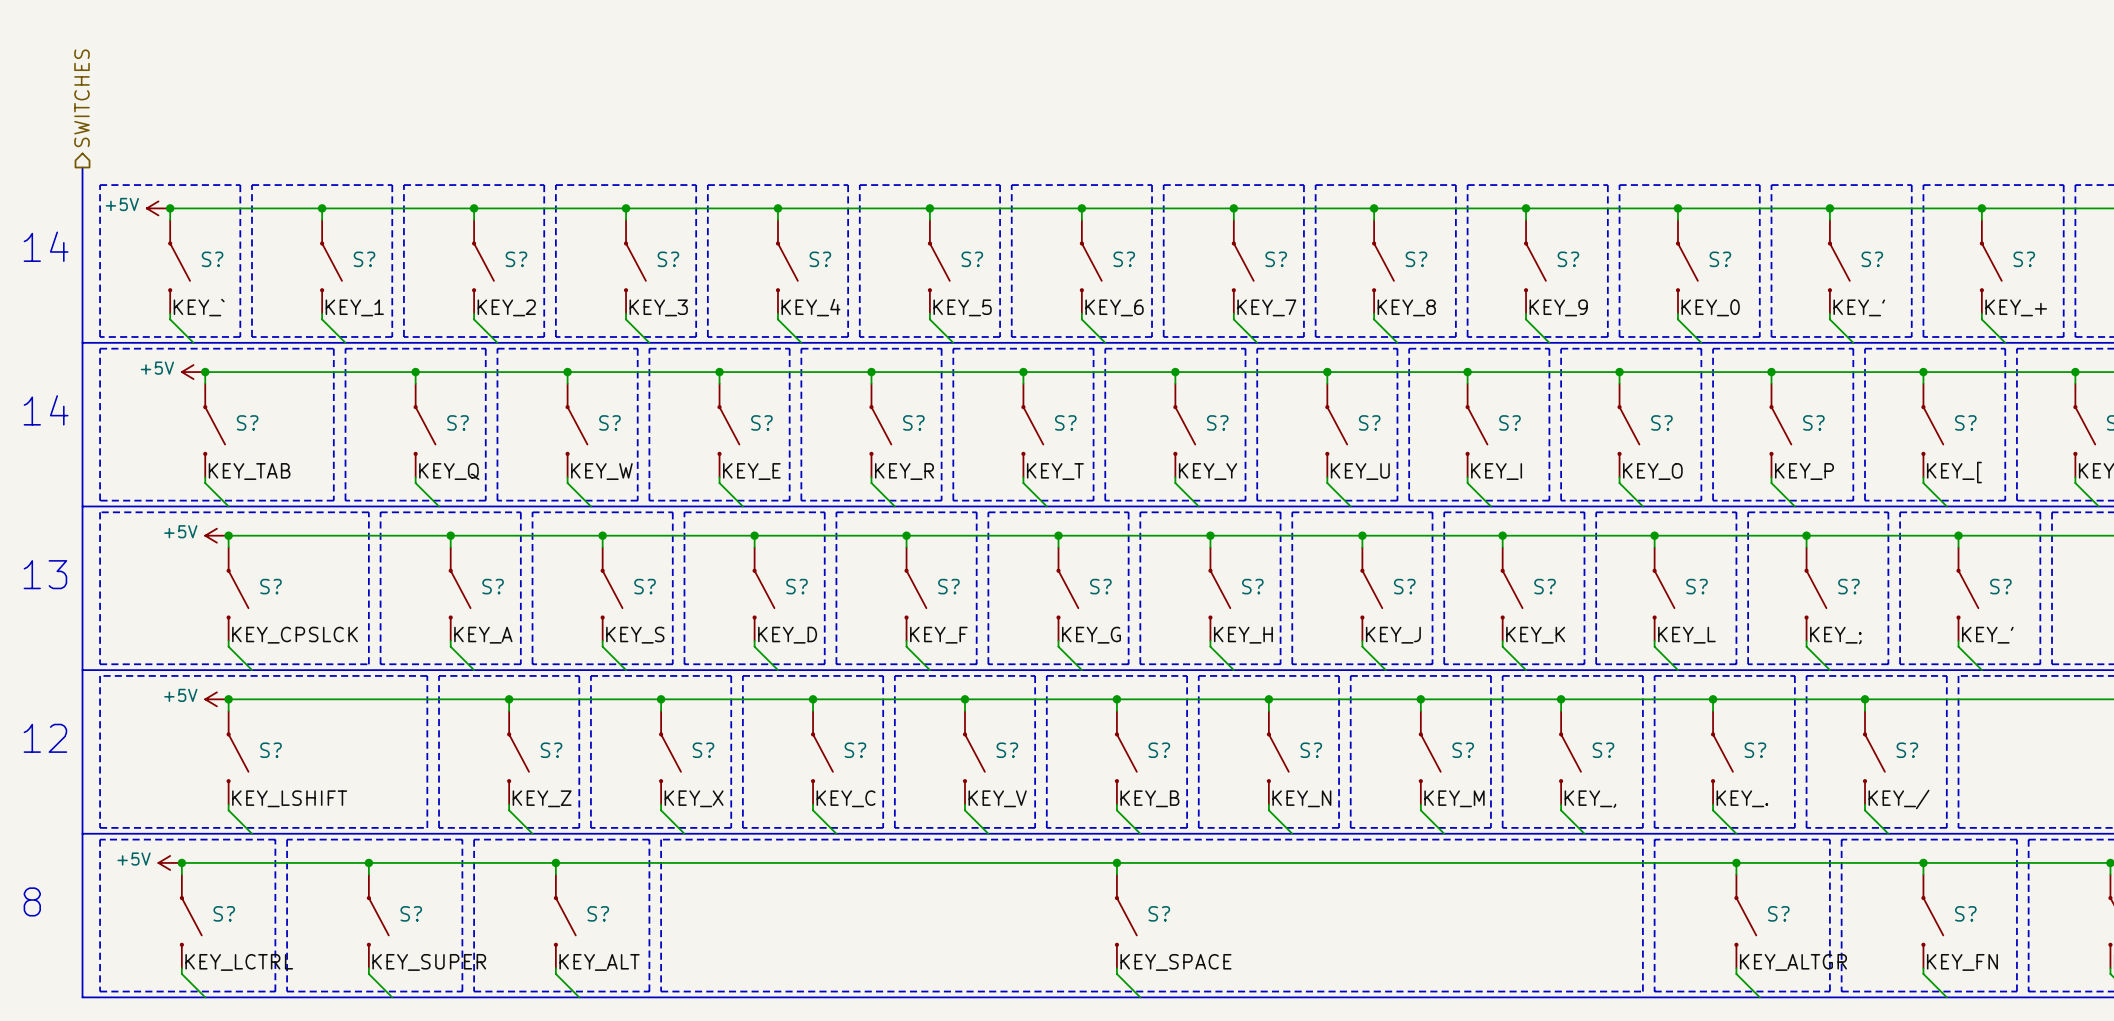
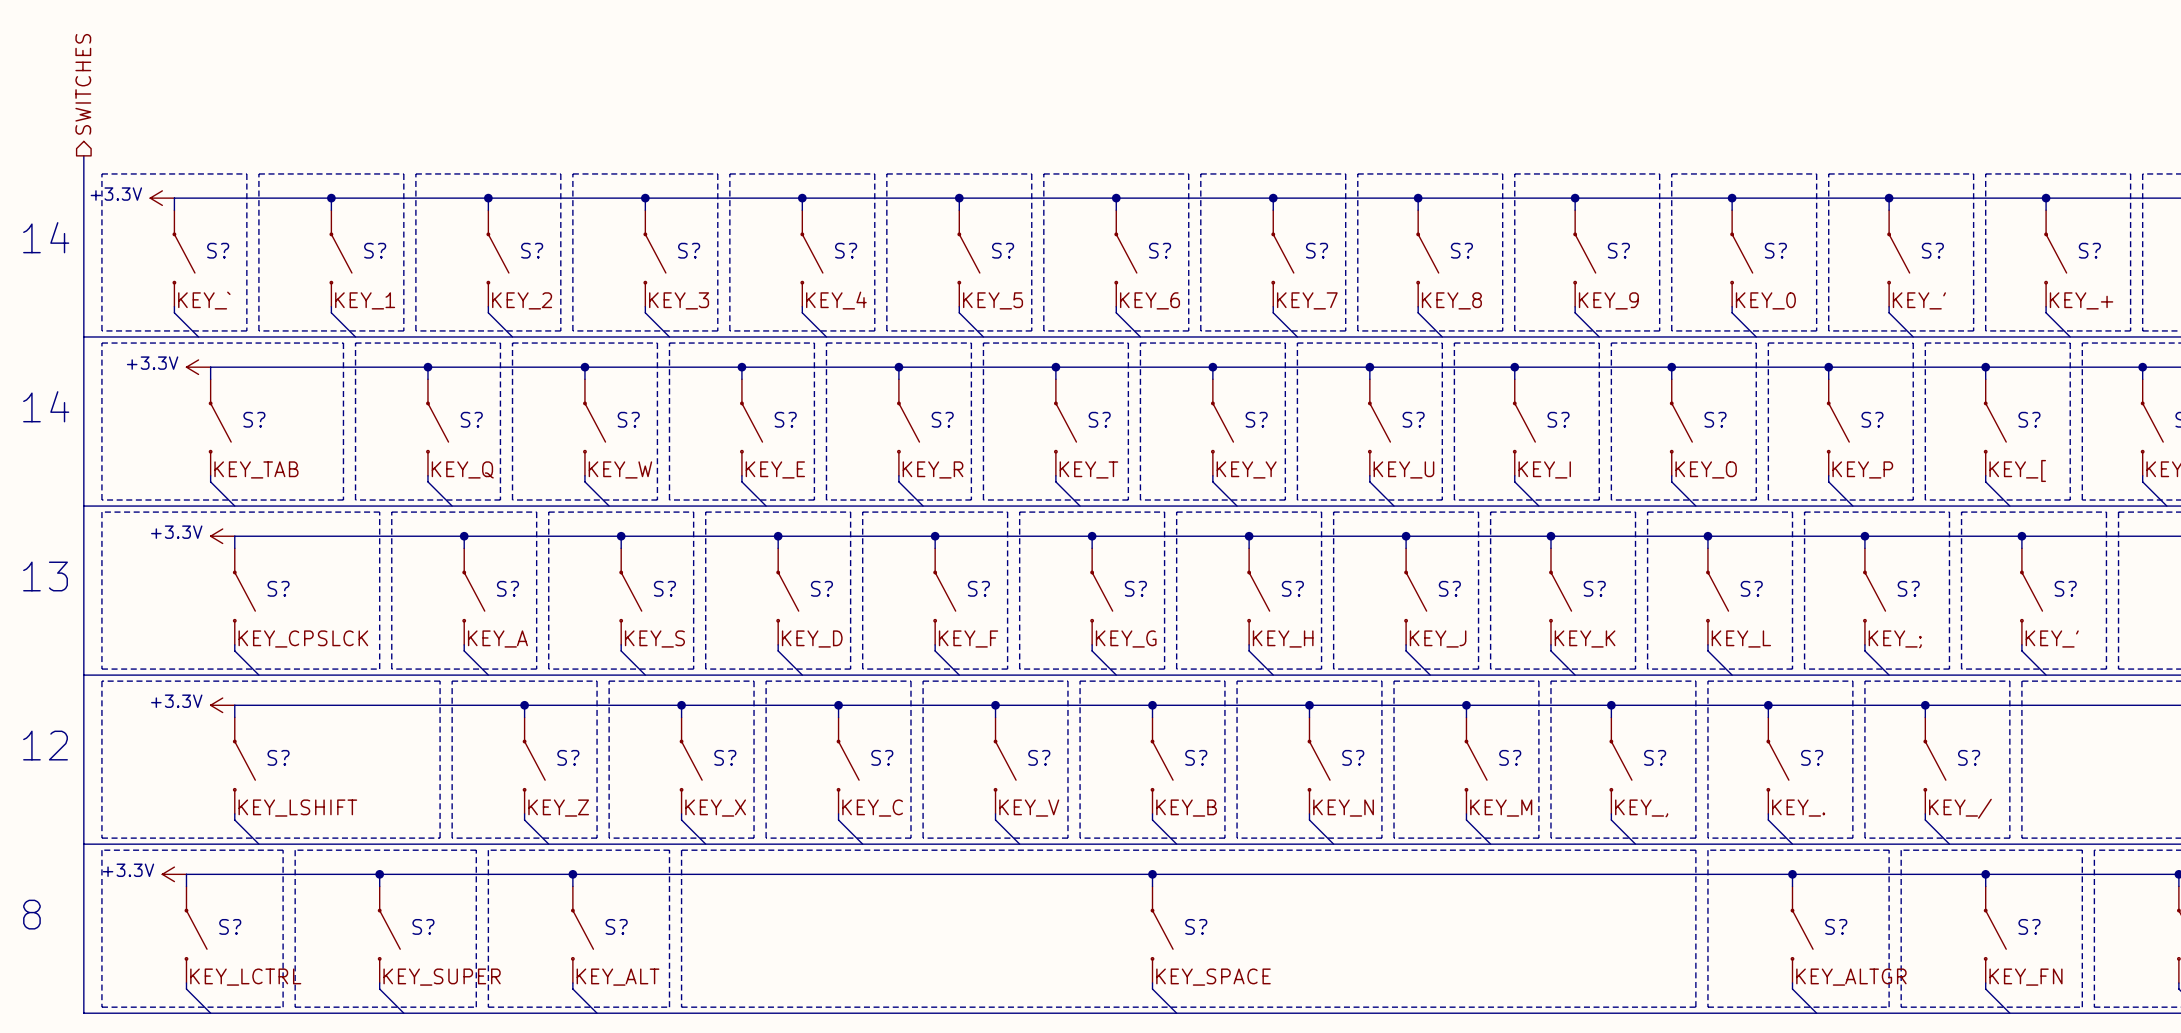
power symbol: +5V (158, 208) -> +3.3V (162, 198)
junction: (170, 208) -> none
power symbol: +5V (193, 372) -> +3.3V (198, 367)
junction: (205, 372) -> none
power symbol: +5V (216, 535) -> +3.3V (222, 536)
junction: (228, 535) -> none
power symbol: +5V (216, 699) -> +3.3V (222, 705)
junction: (228, 699) -> none
power symbol: +5V (170, 862) -> +3.3V (174, 874)
junction: (181, 862) -> none

